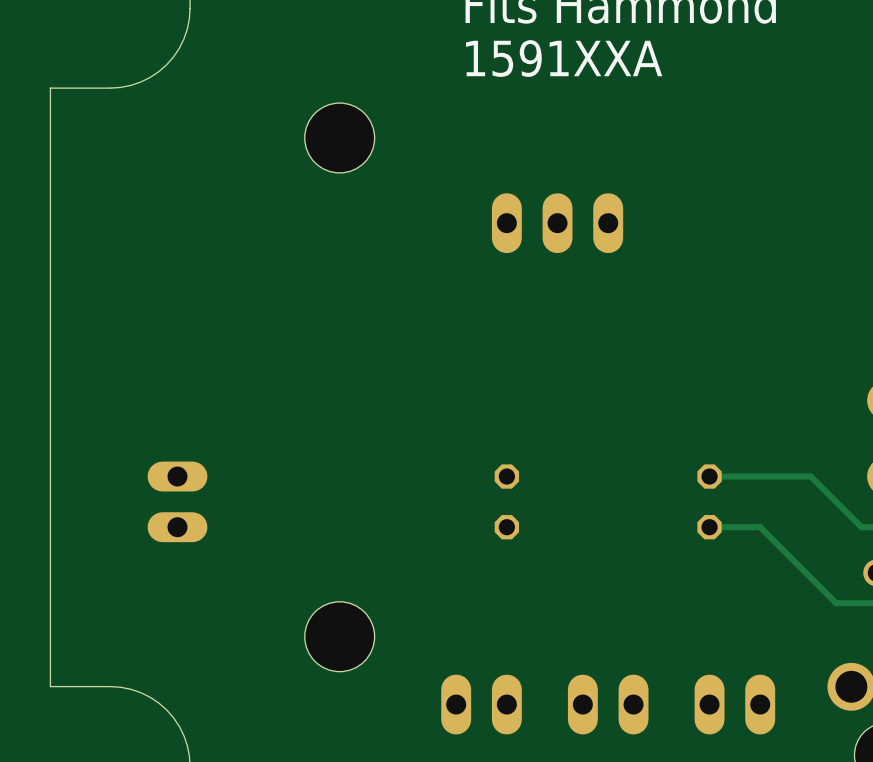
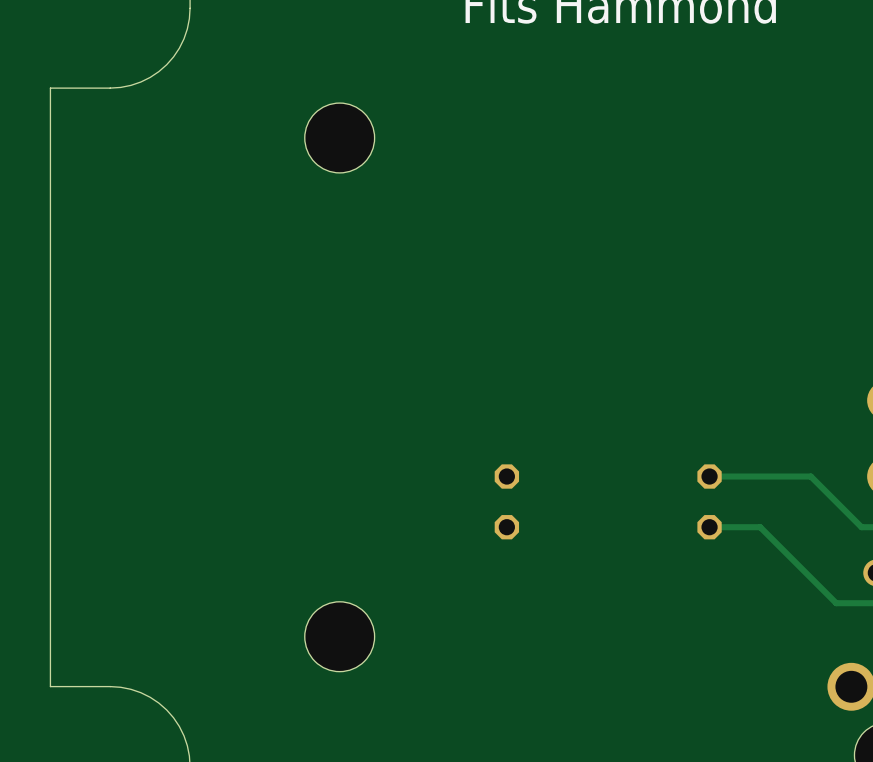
text: 1591XXA (564, 58) -> none
part: (557, 223) -> none
part: (177, 501) -> none
part: (481, 704) -> none
part: (608, 704) -> none
part: (734, 704) -> none

